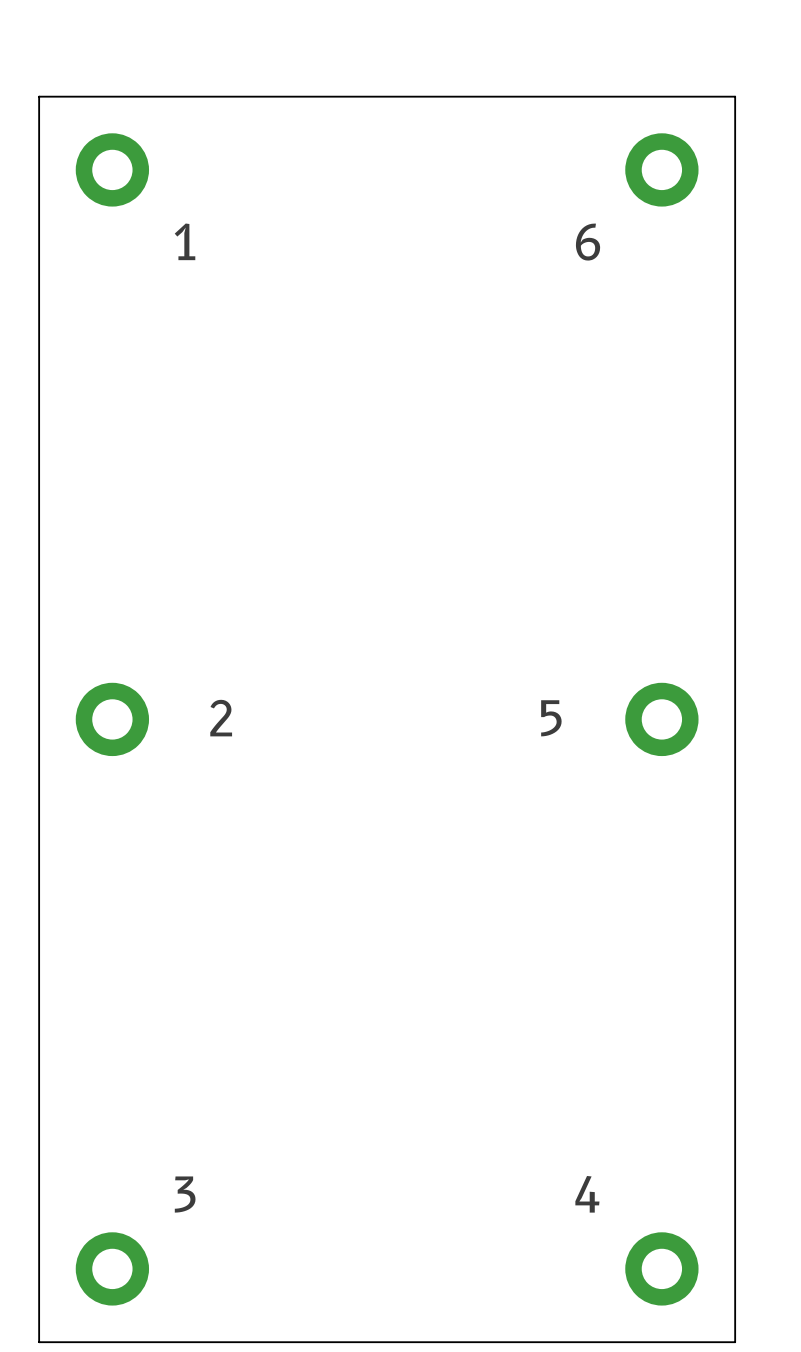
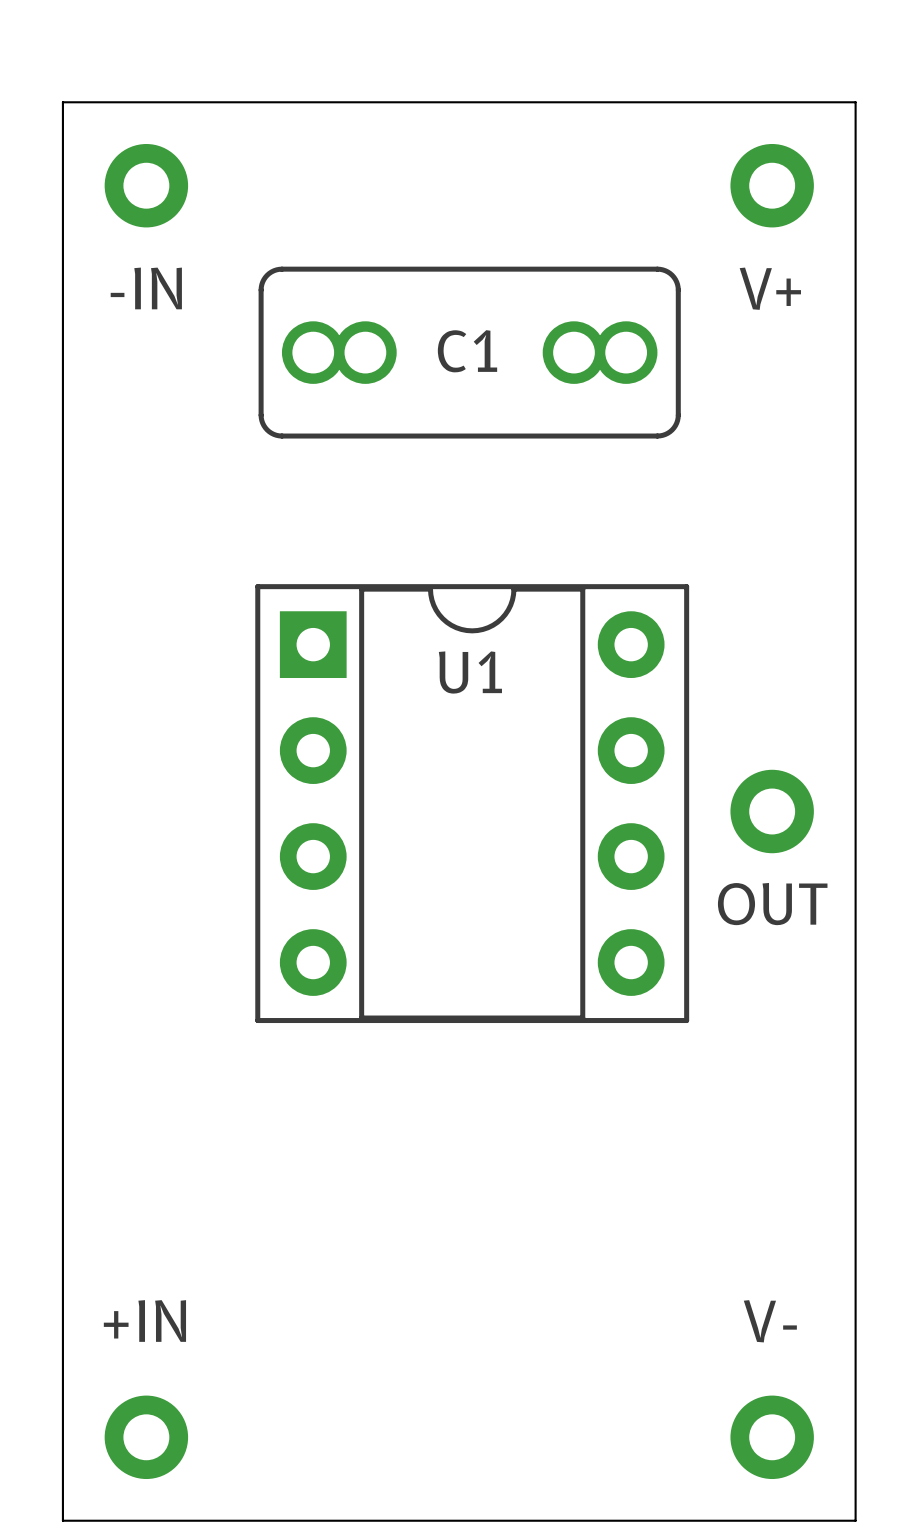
part value: 1 (185, 241) -> -IN (146, 288)
part value: 6 (588, 242) -> V+ (770, 288)
C1: none -> (469, 352)
U1: none -> (472, 803)
part value: 5 (551, 718) -> OUT (772, 904)
part: 2 (112, 719) -> none
part value: 3 (185, 1194) -> +IN (144, 1321)
part value: 4 (587, 1194) -> V- (770, 1321)

